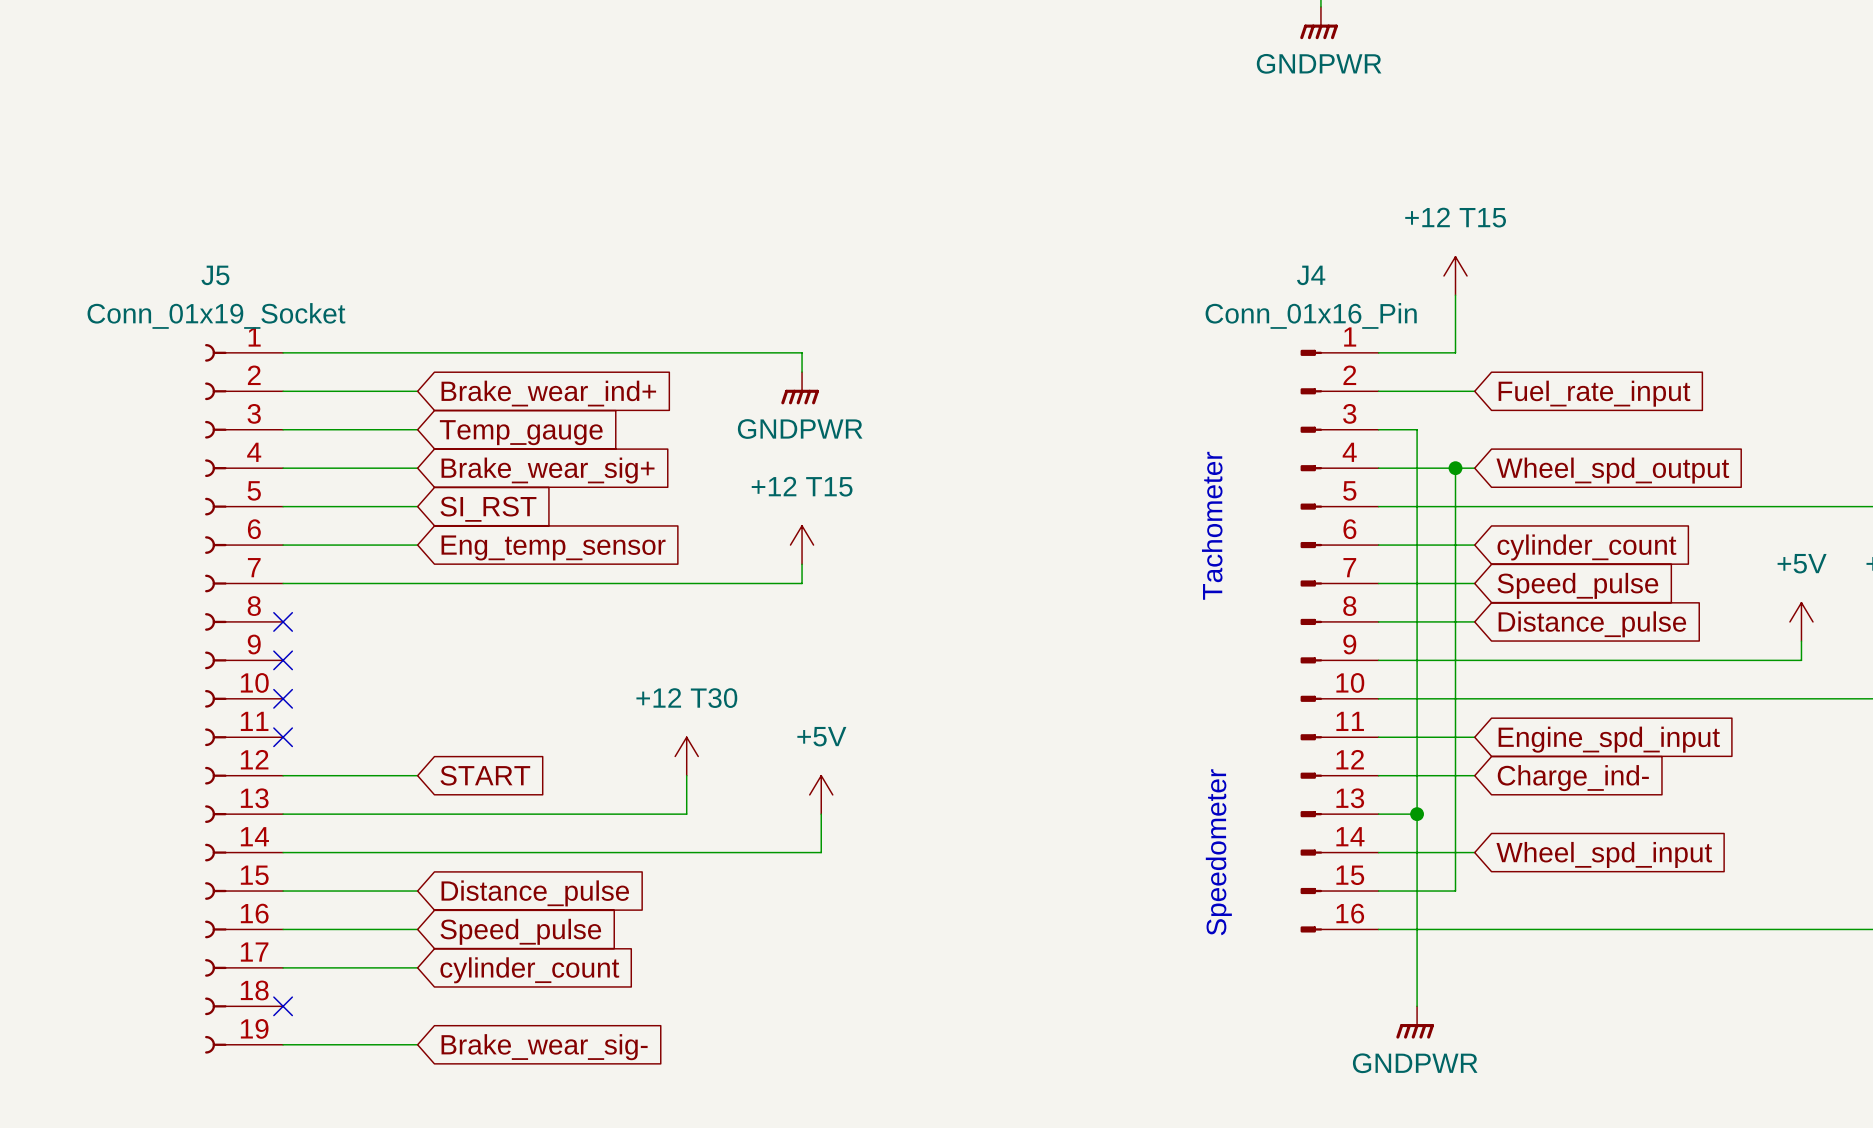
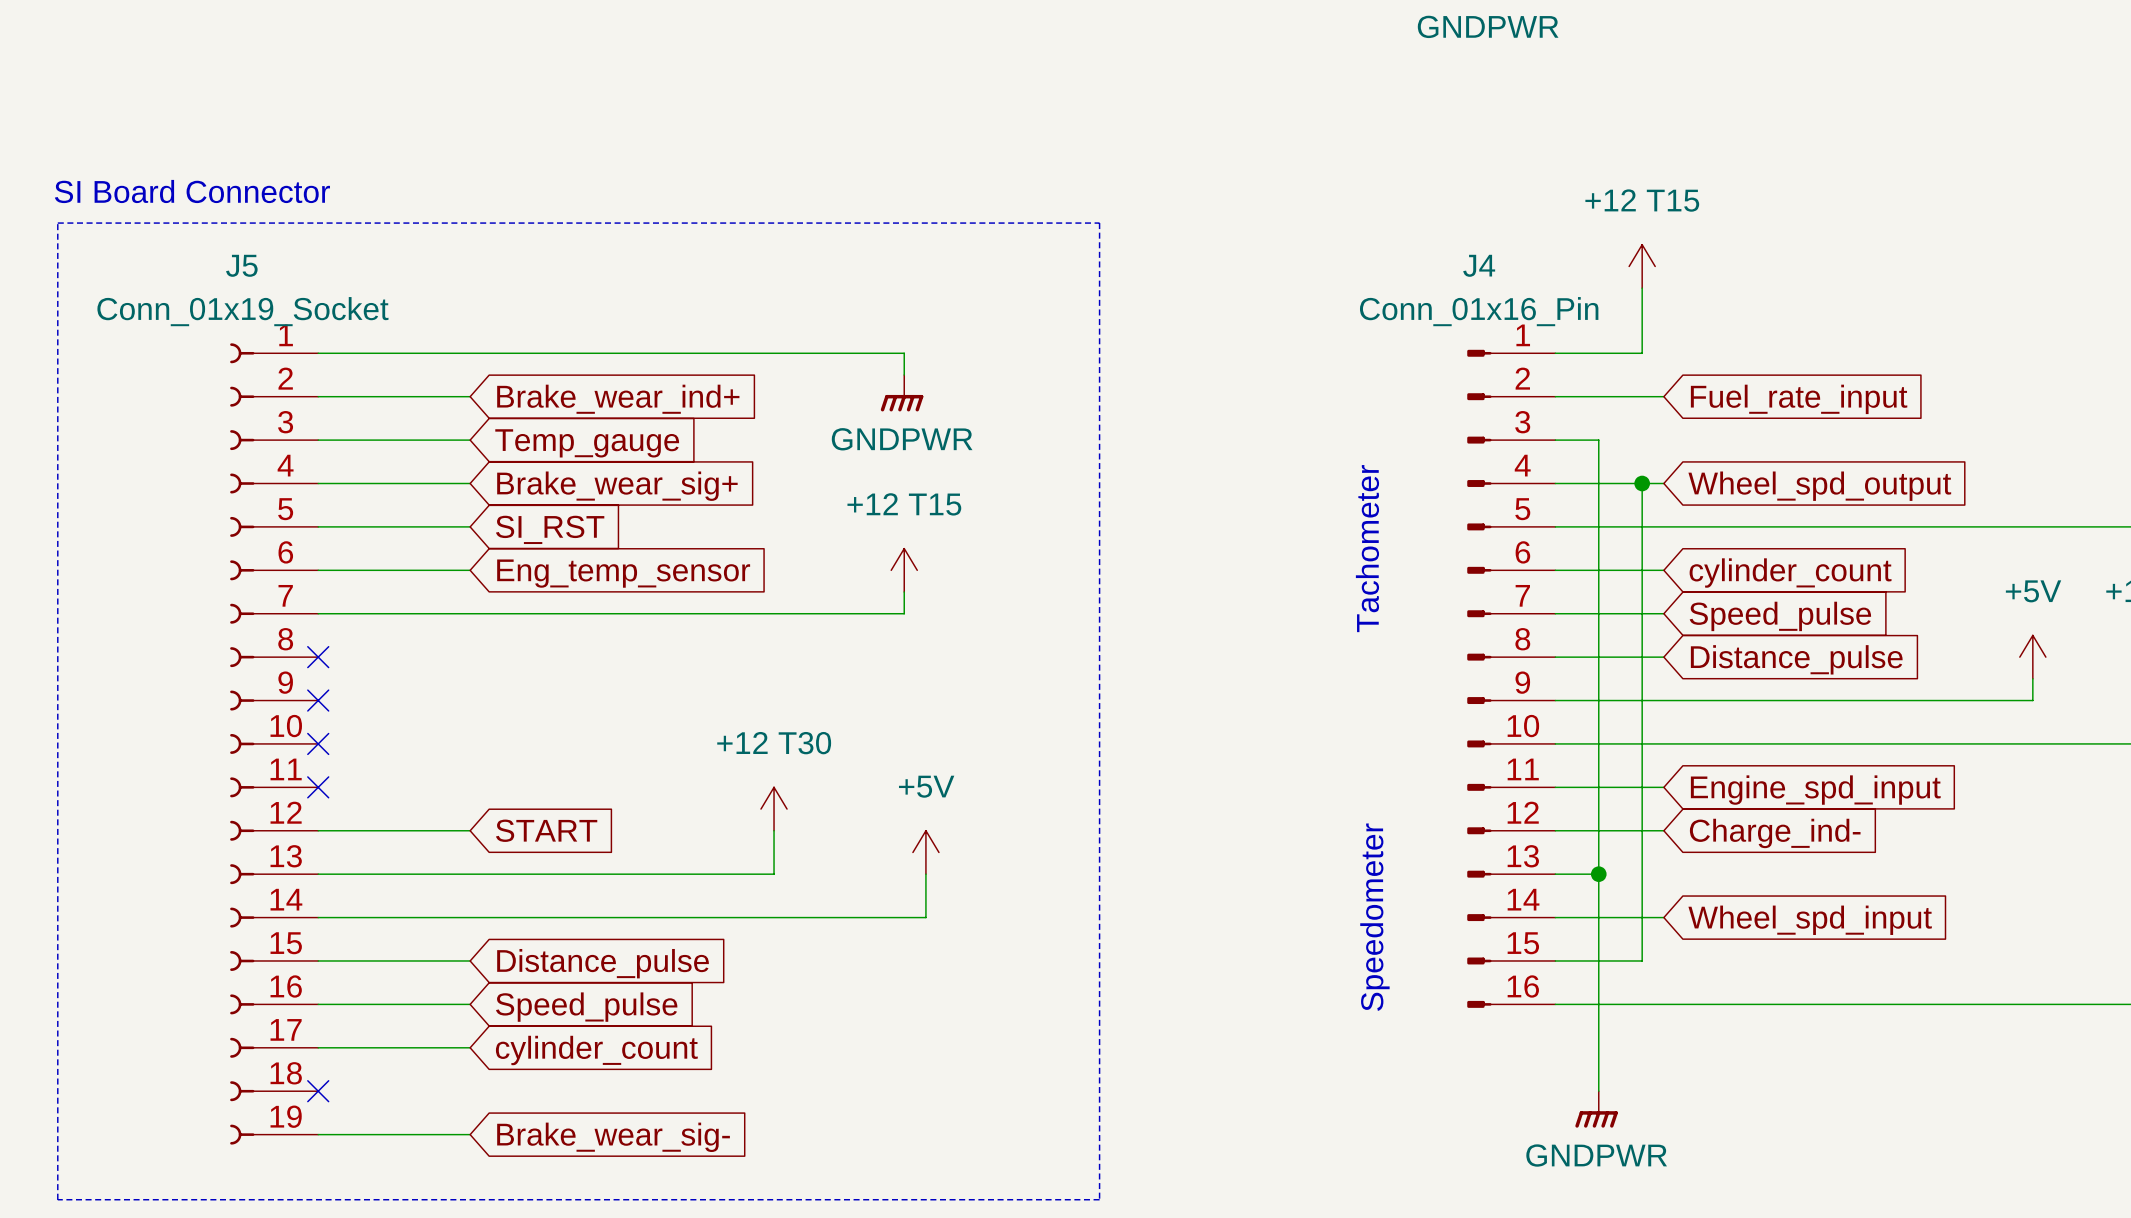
text: none -> SI Board Connector (192, 191)
line: none -> (57, 223) (1099, 223) (1099, 1199) (57, 1199) (57, 223)

